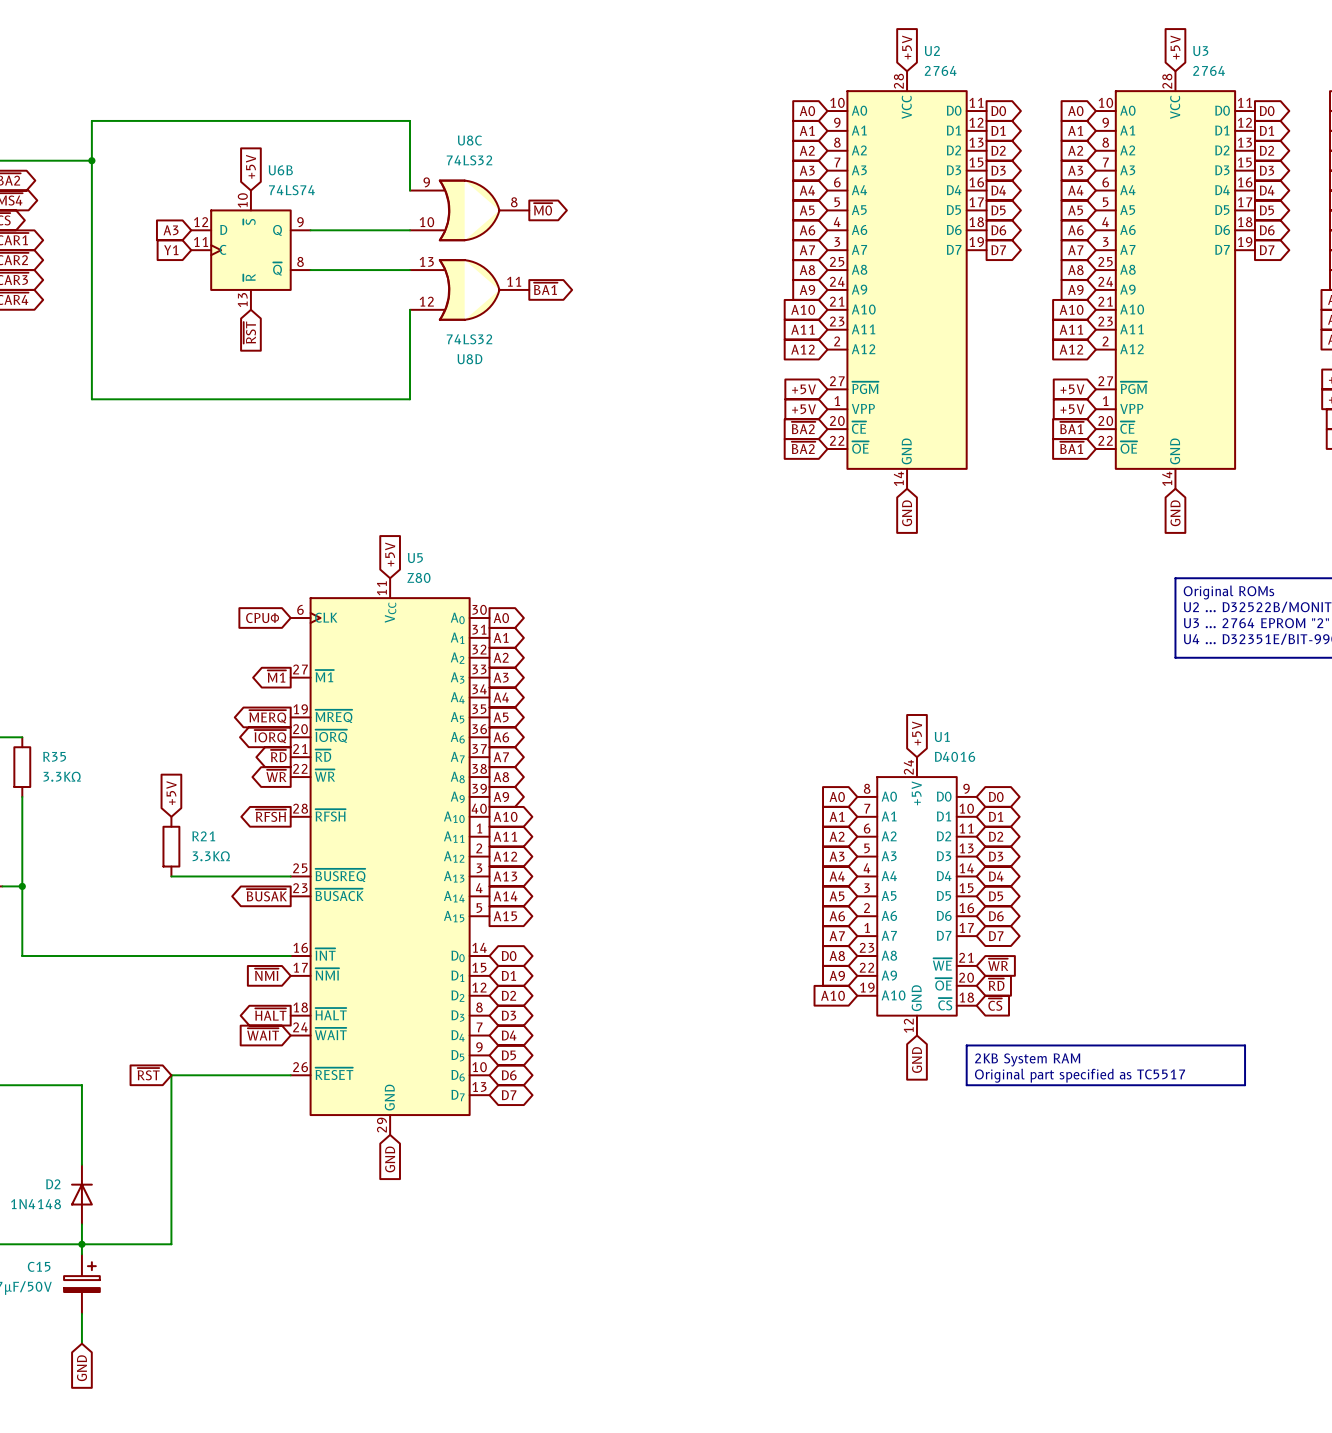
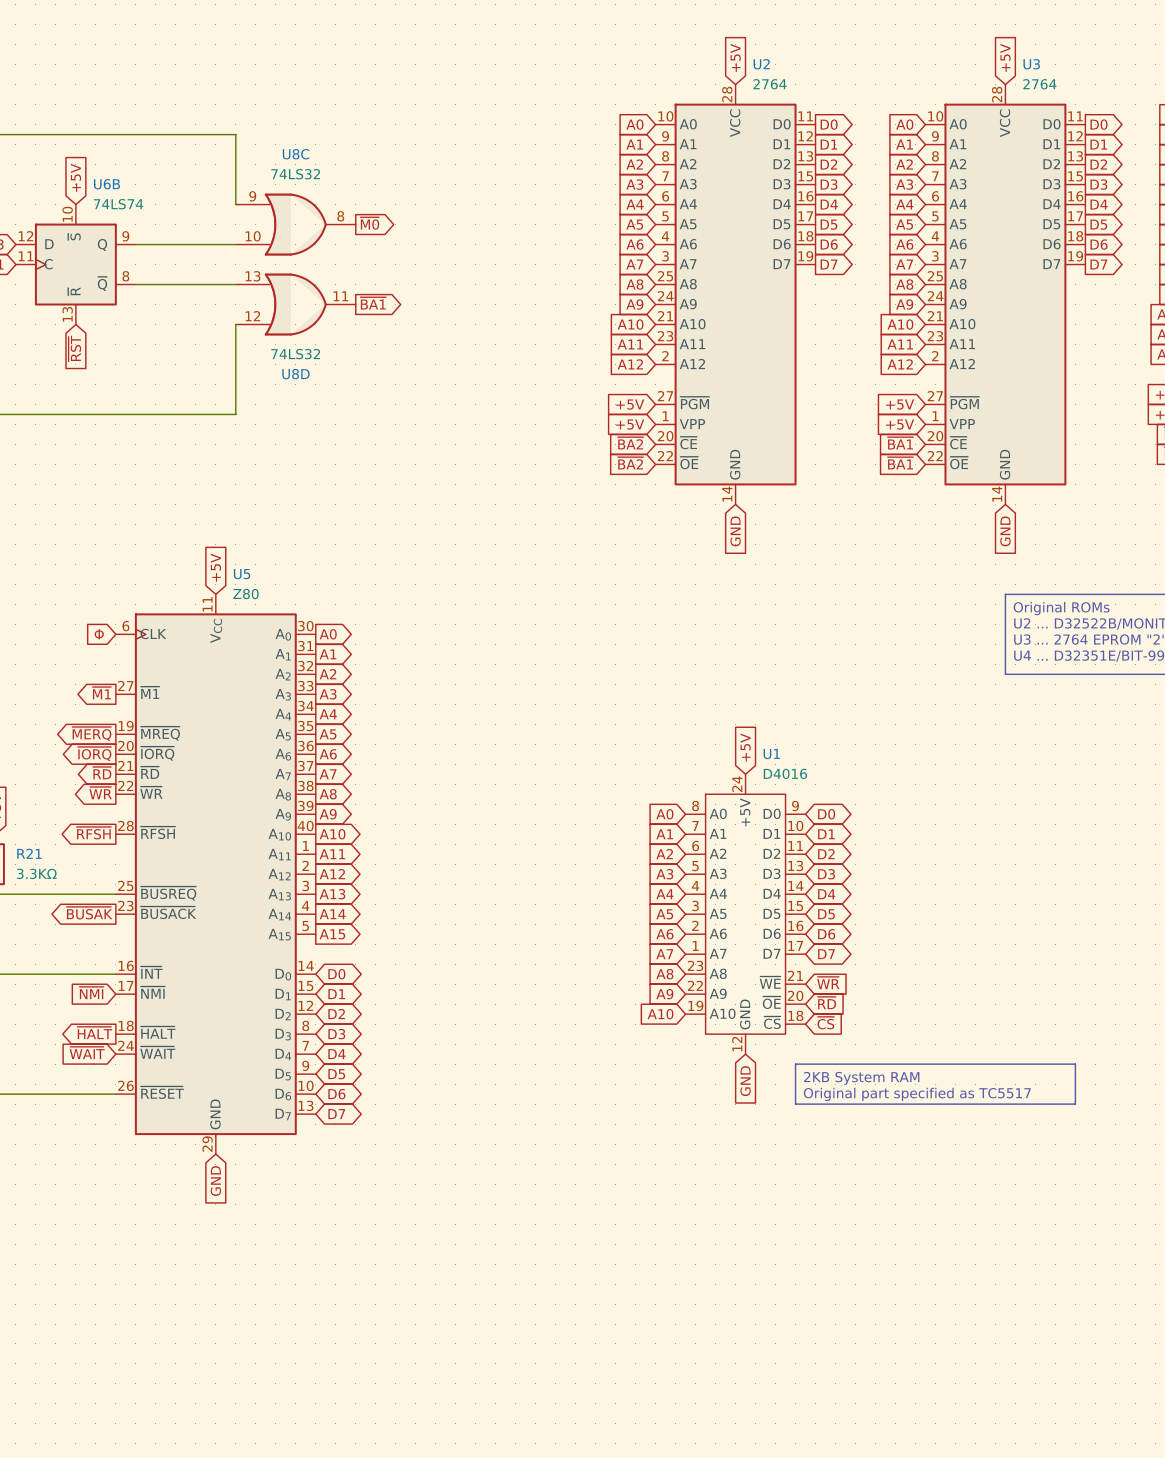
global label: CPUΦ (262, 618) -> Φ (99, 634)

